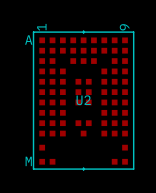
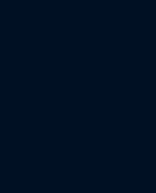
U2: (83, 100) -> none

